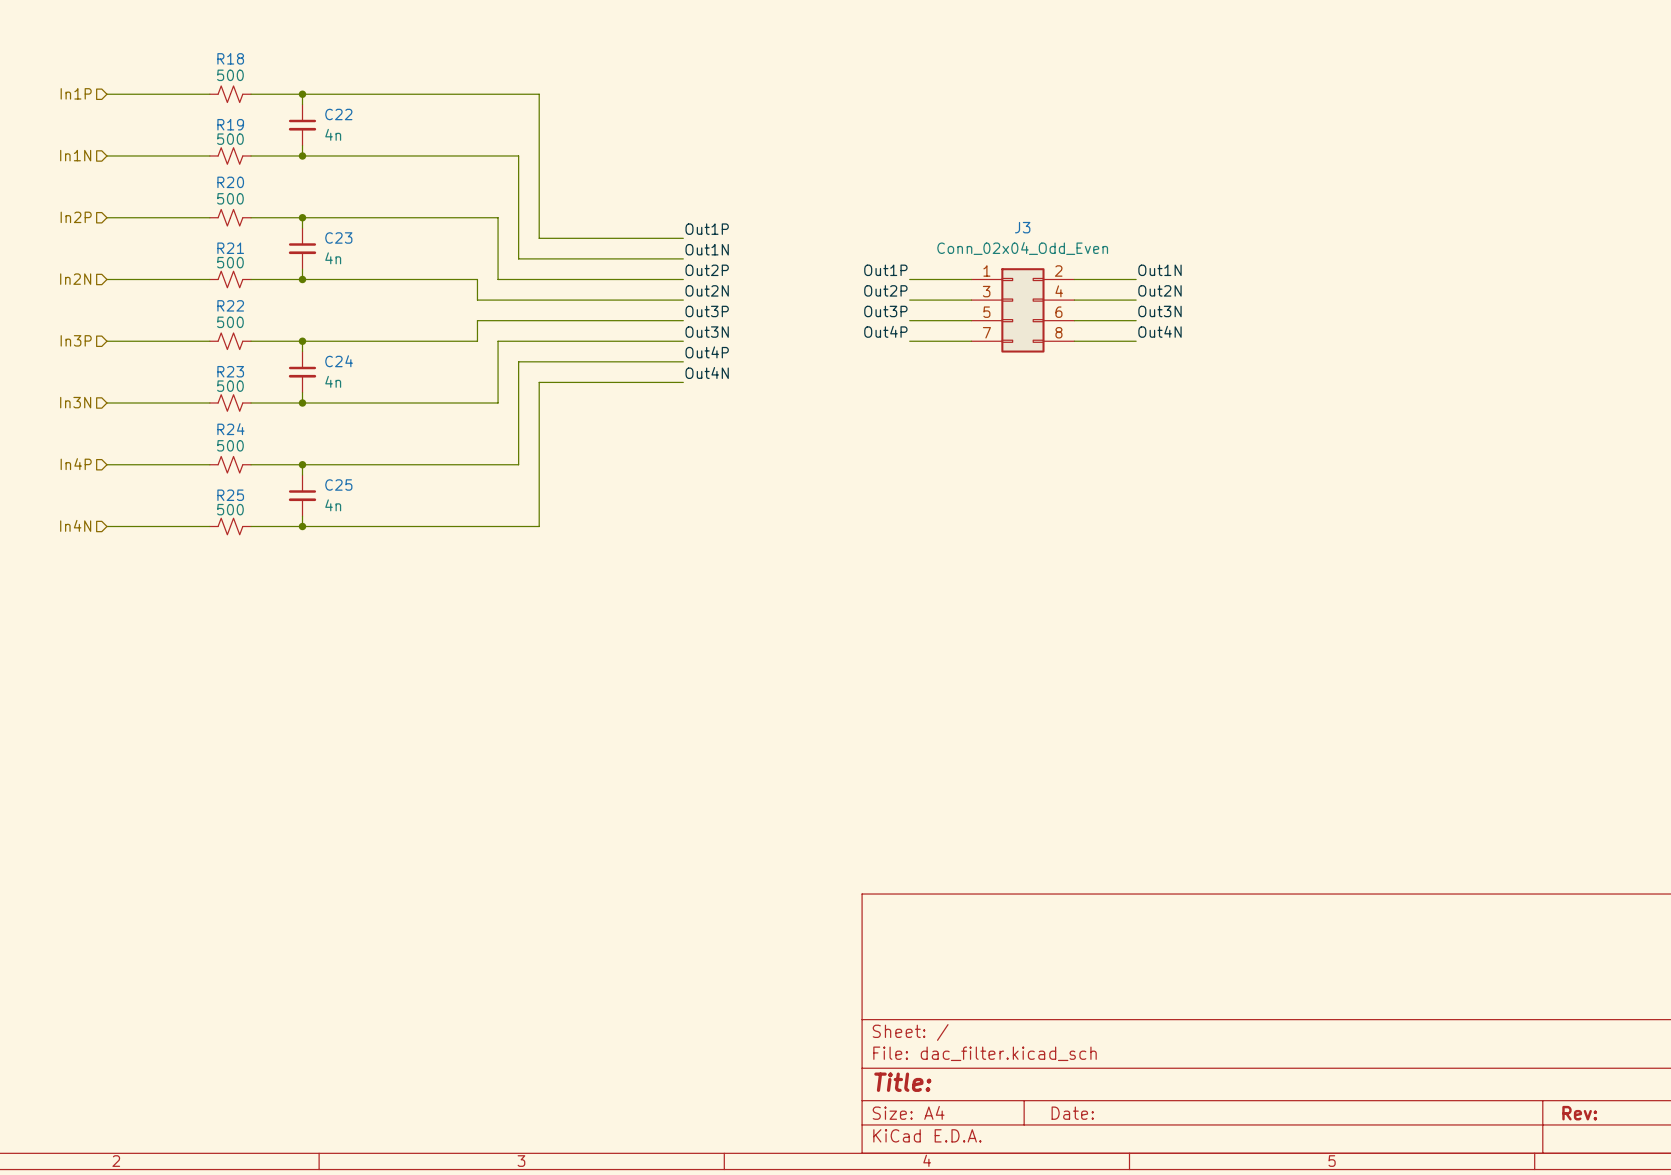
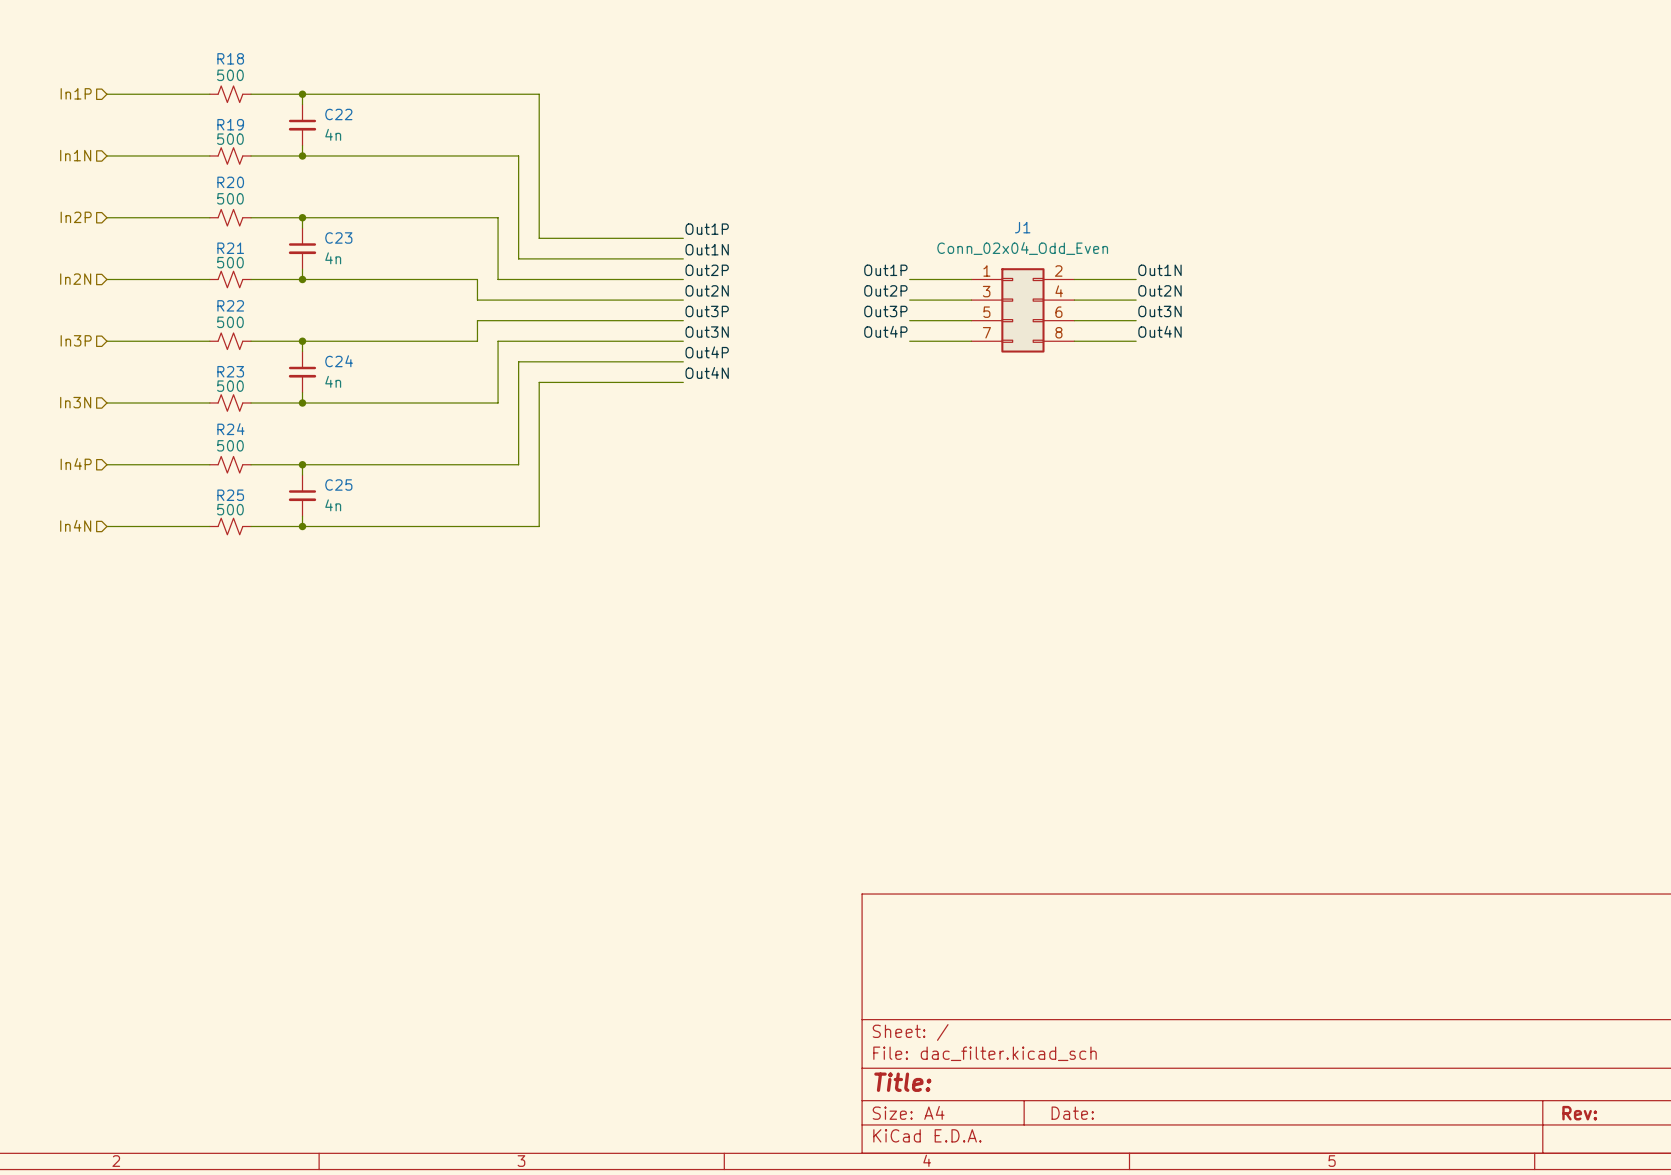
J3 name: J3 (1022, 227) -> J1 (1022, 227)

